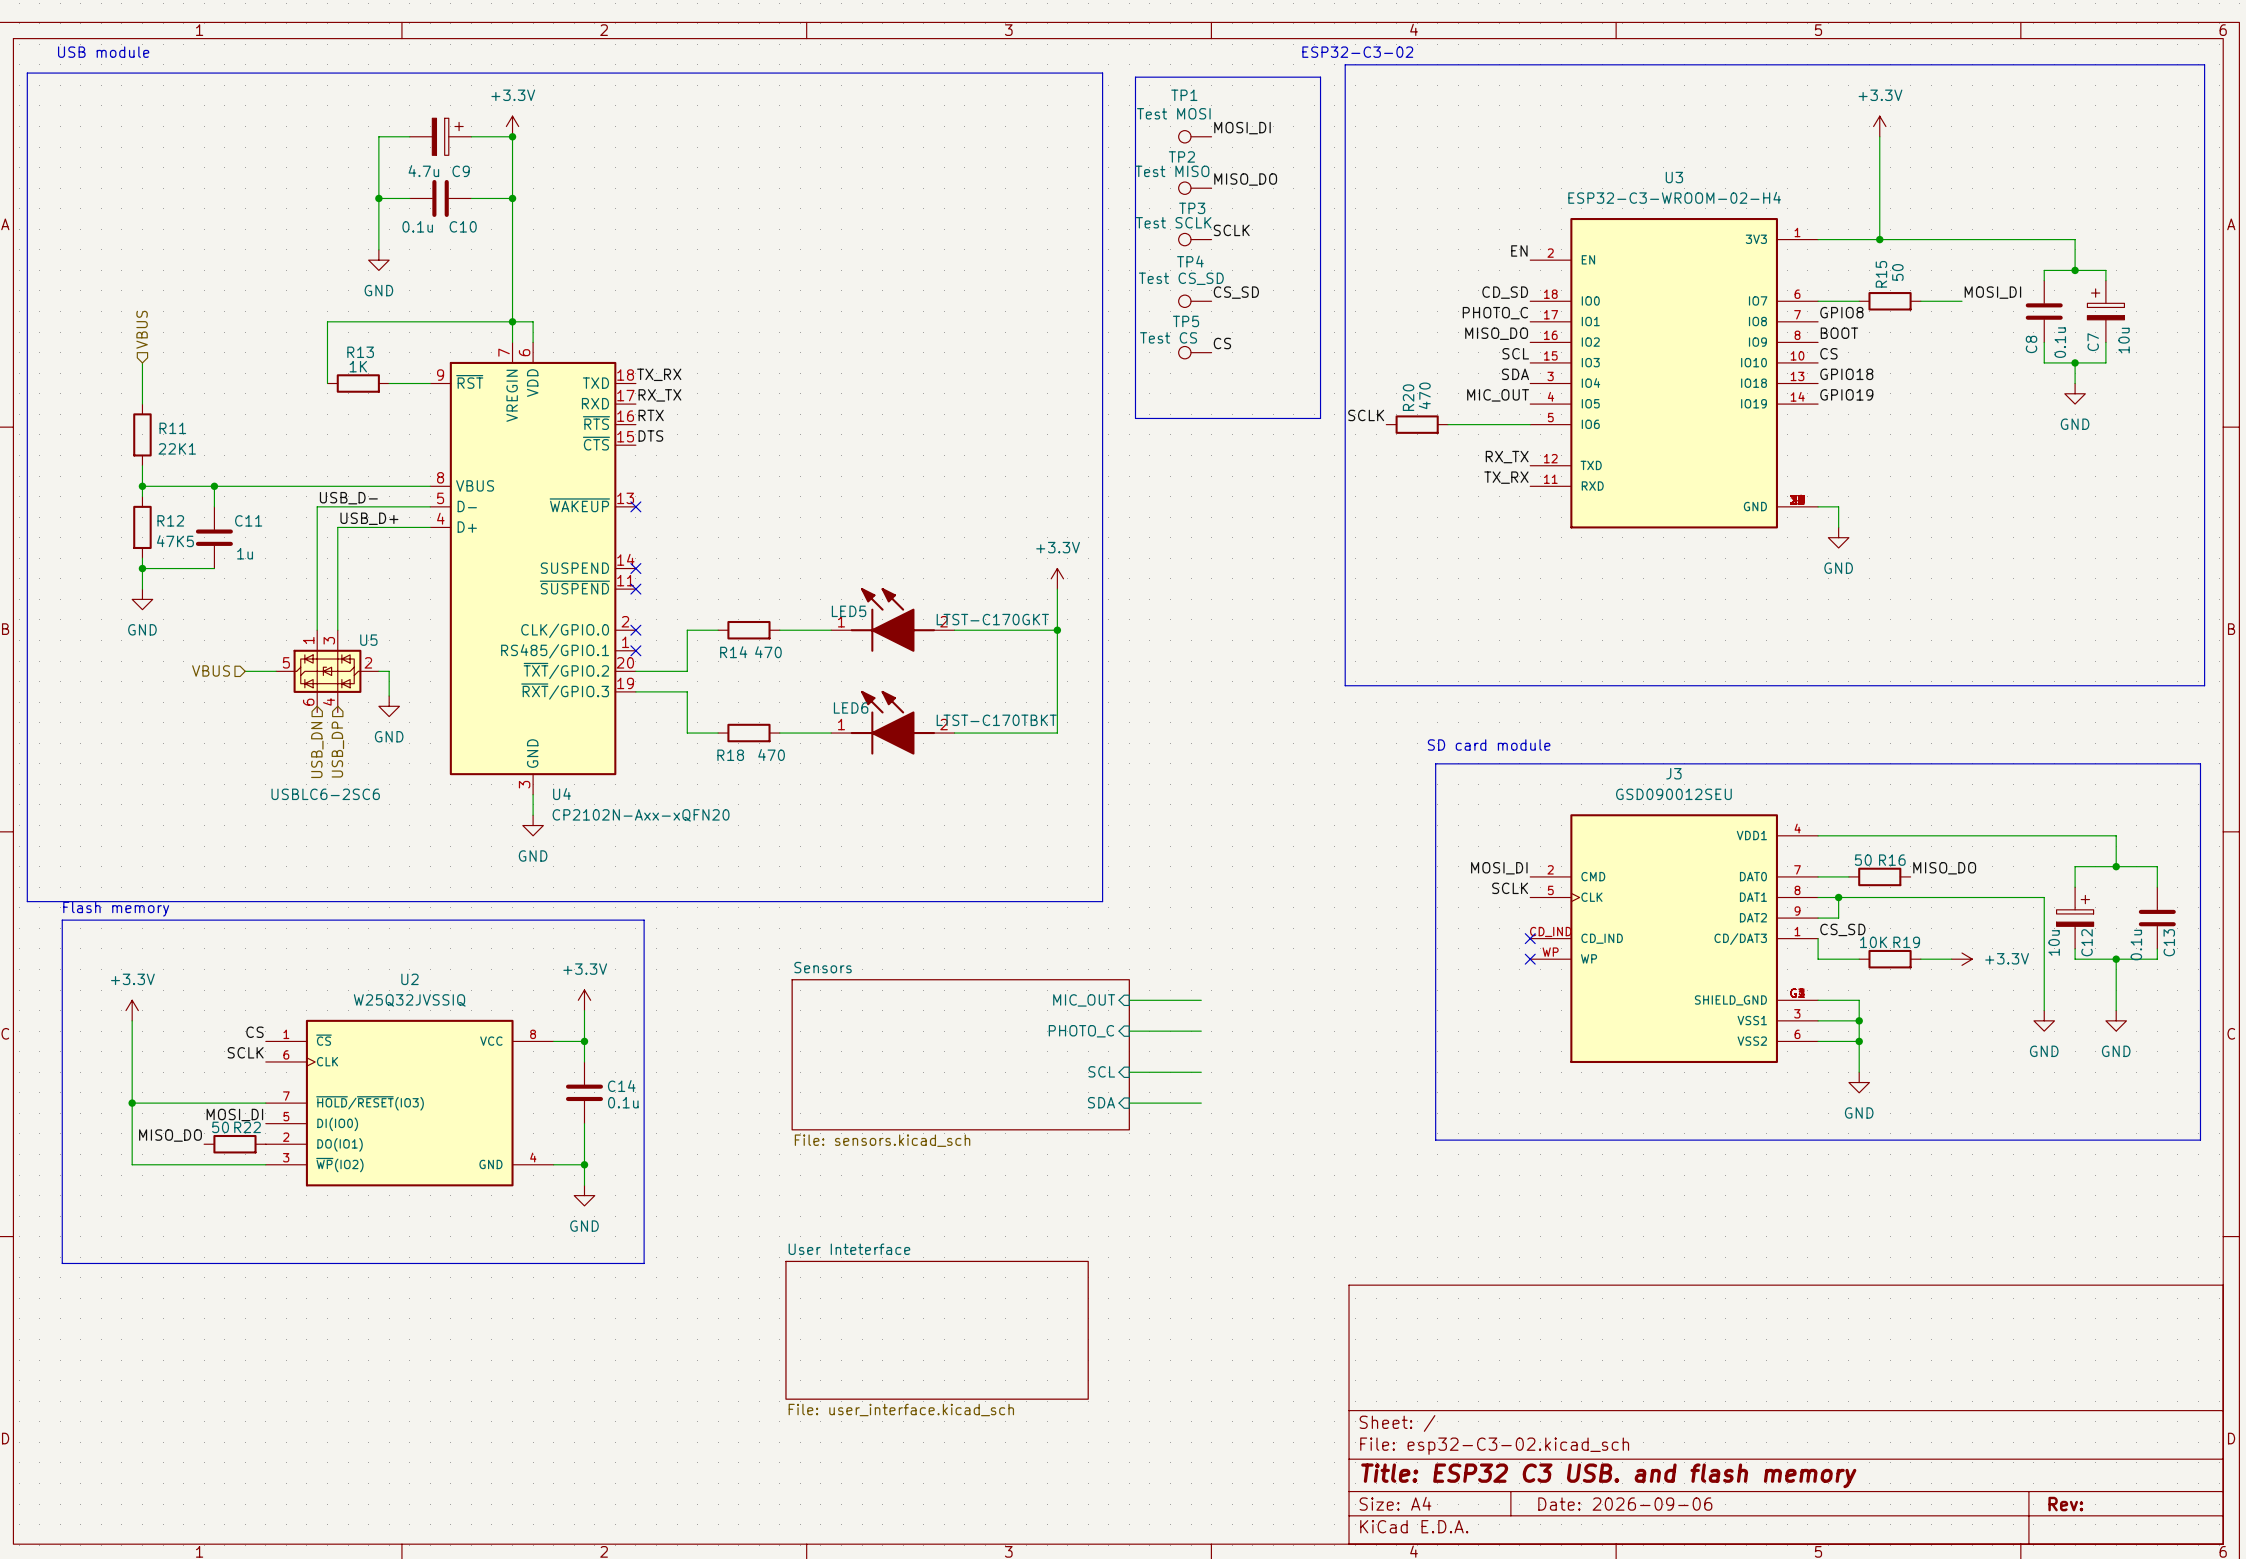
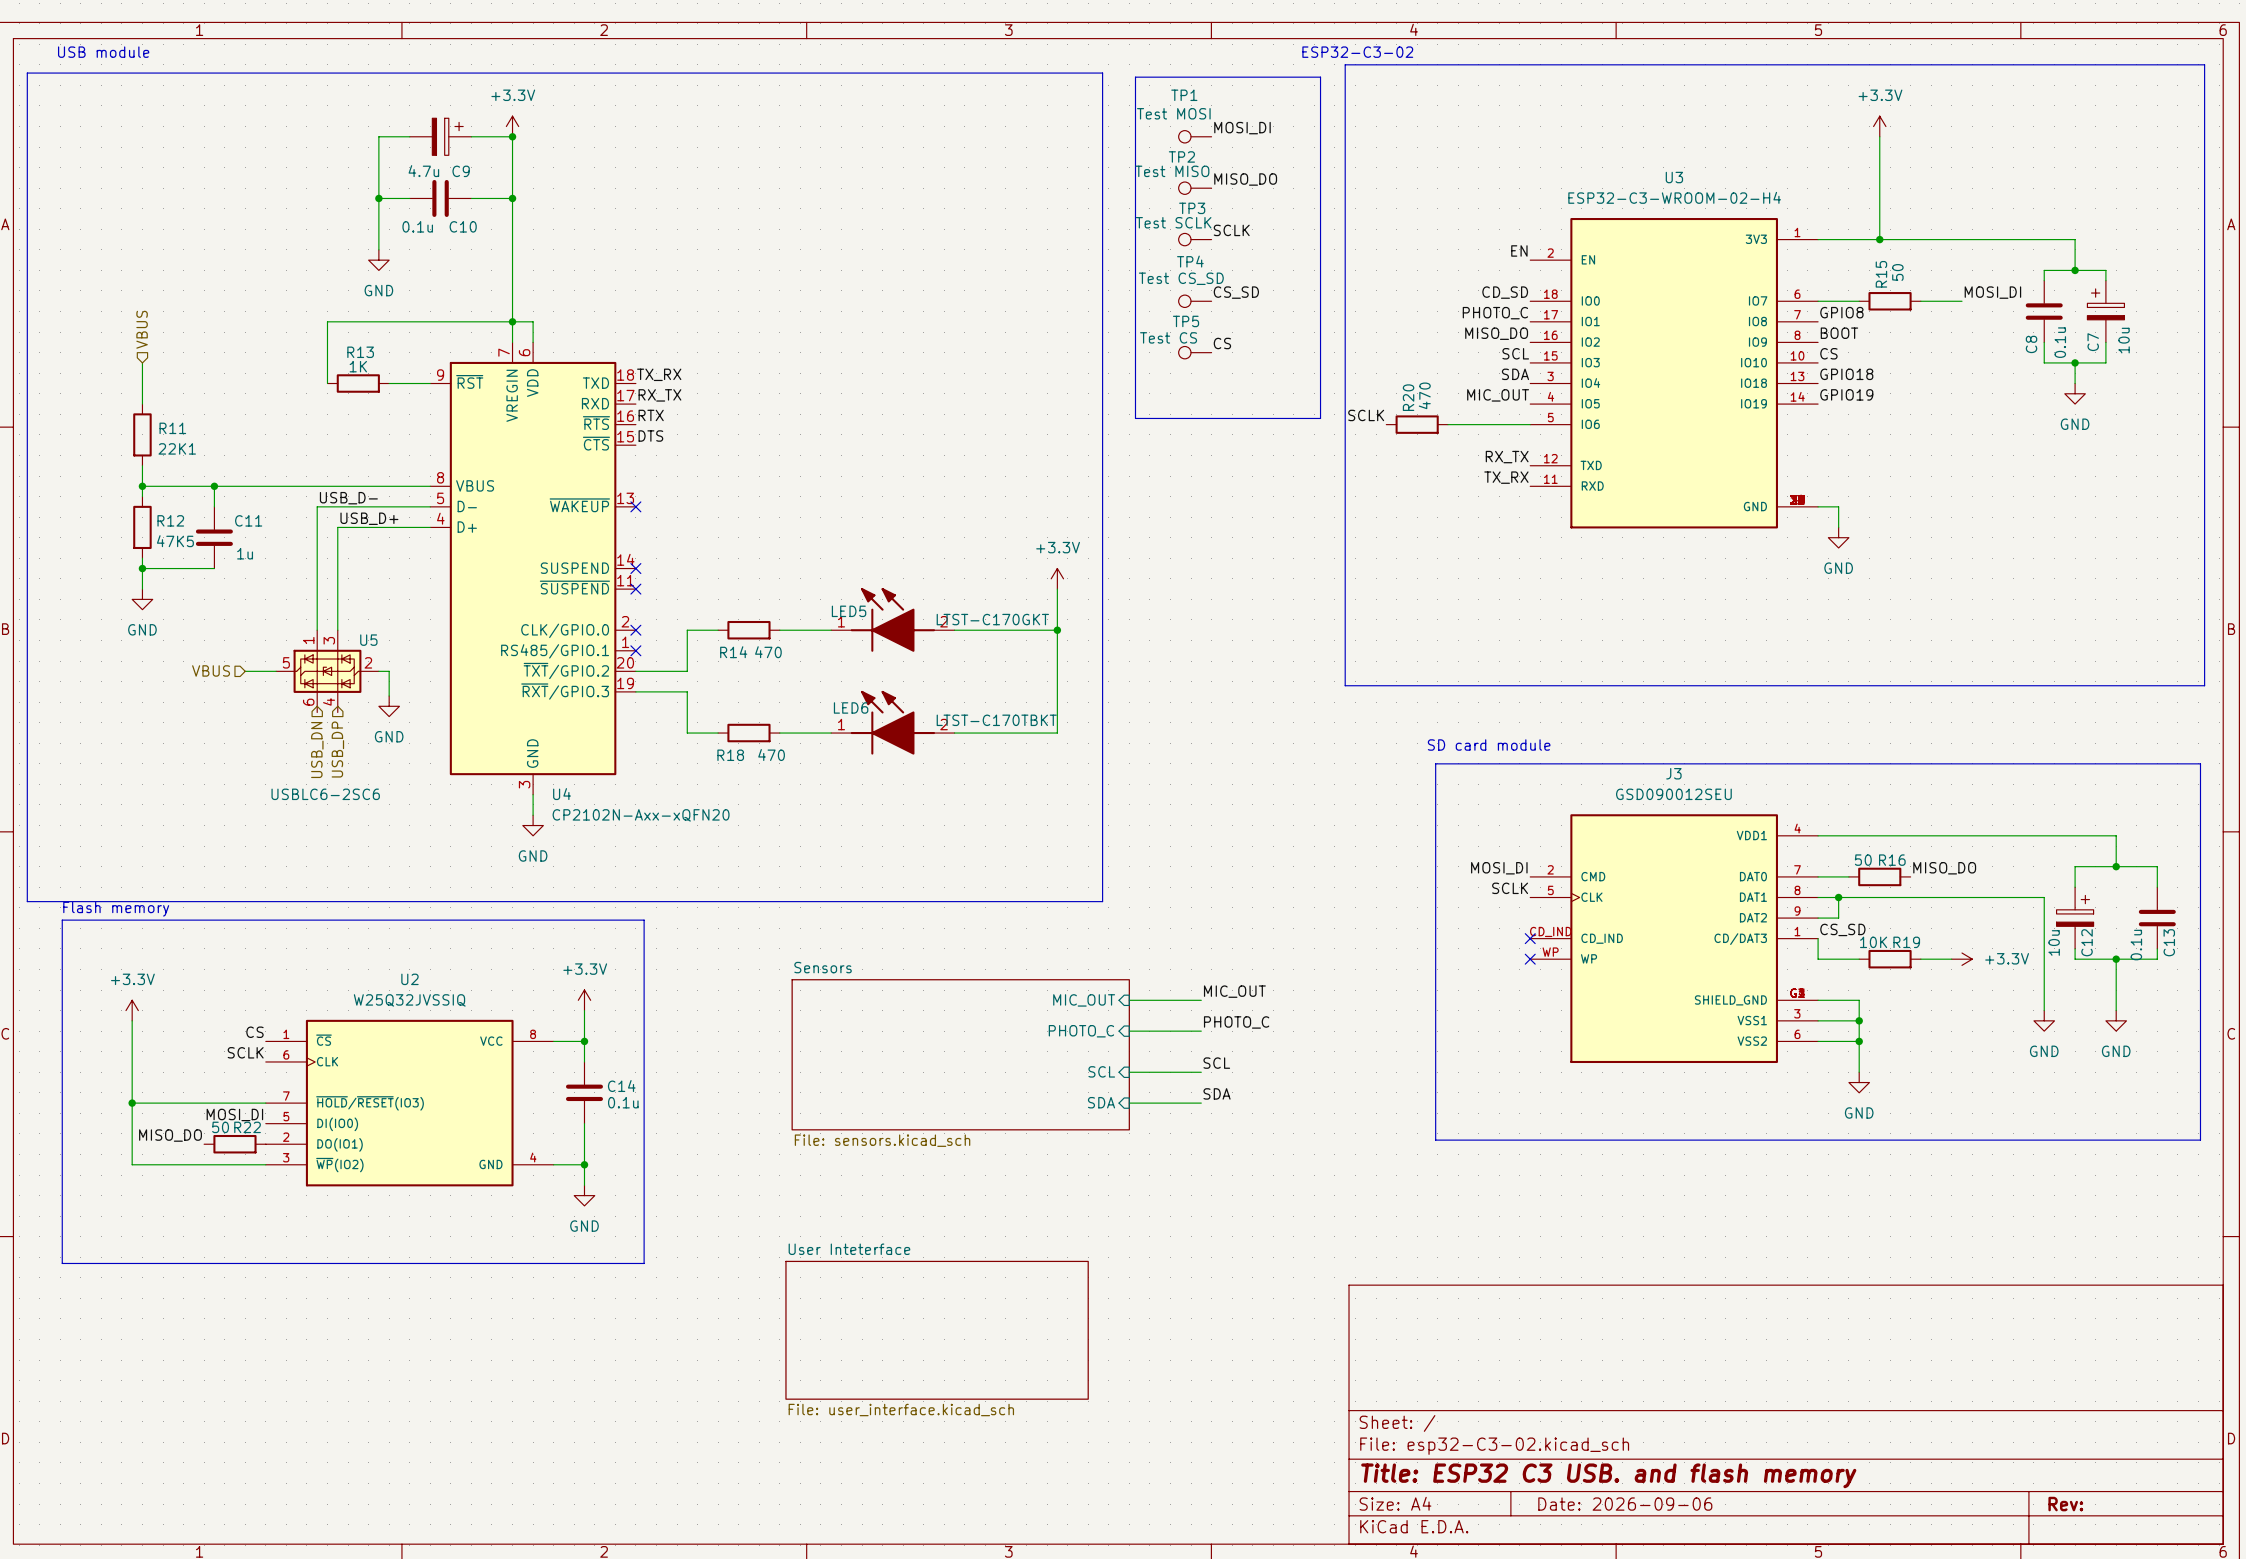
label: none -> MIC_OUT (1234, 991)
label: none -> PHOTO_C (1236, 1022)
label: none -> SCL (1216, 1063)
label: none -> SDA (1217, 1093)

